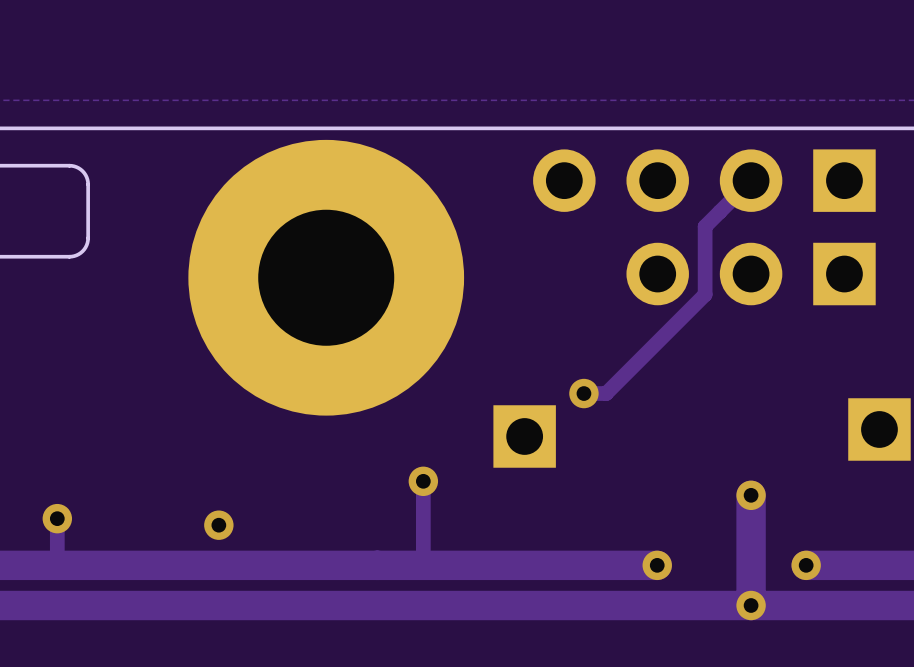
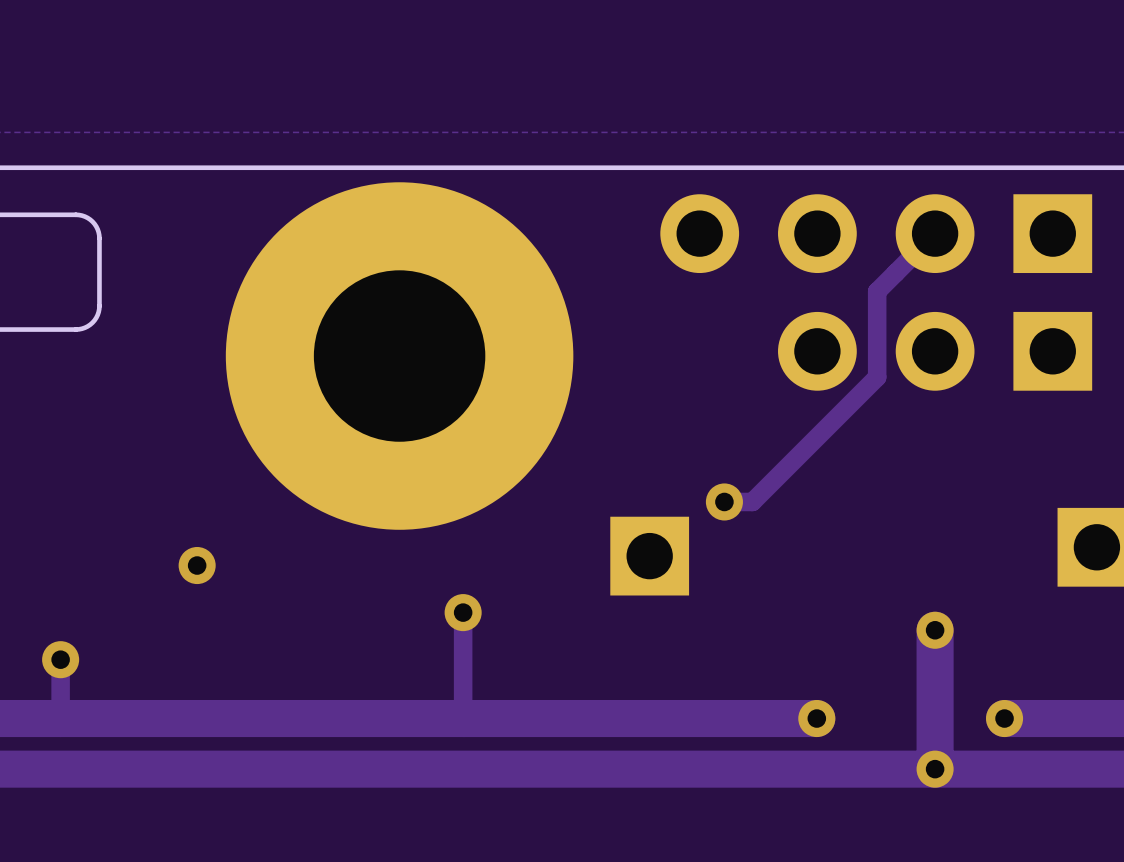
via: none -> (197, 565)
track: (423, 481) (423, 565) -> (463, 612) (463, 718)
via position: (423, 481) -> (463, 612)
via: (218, 525) -> none

